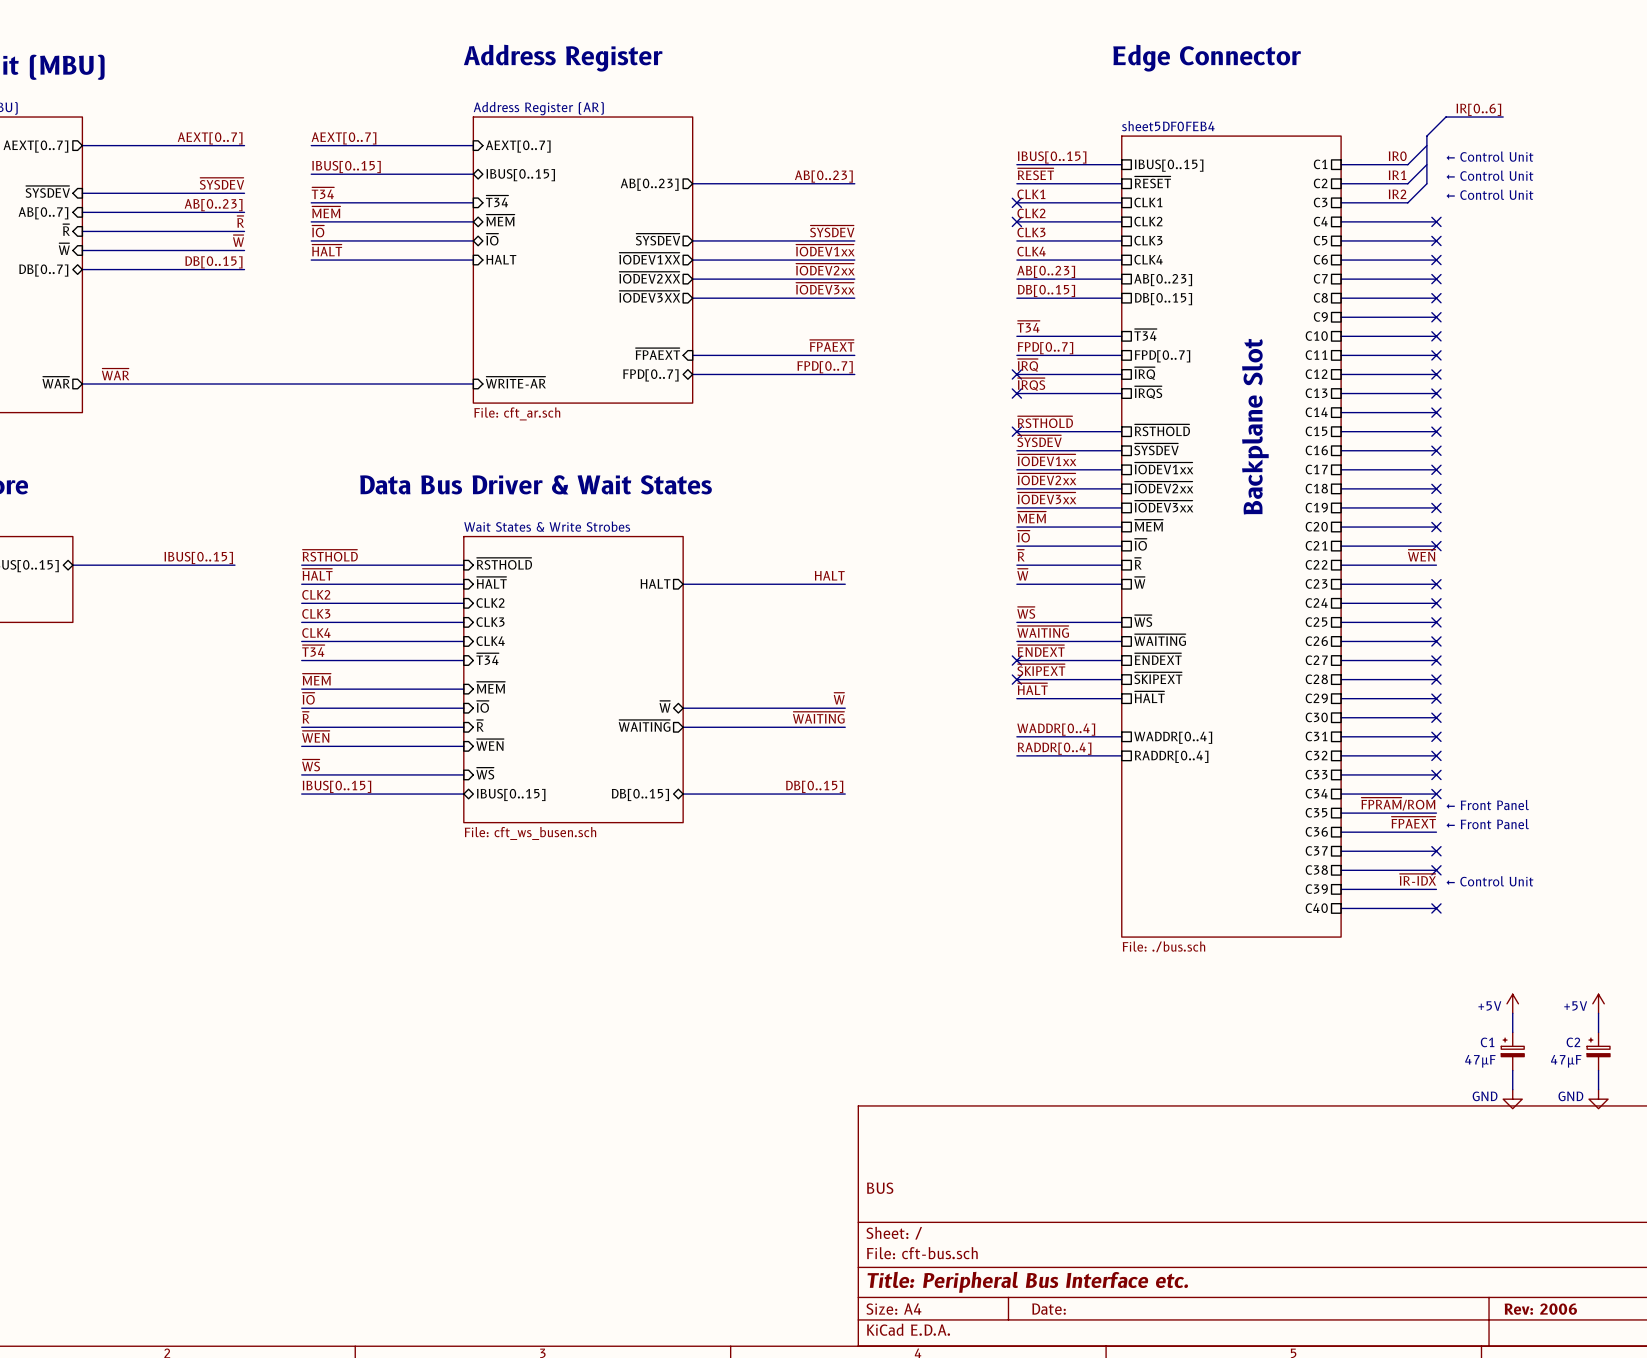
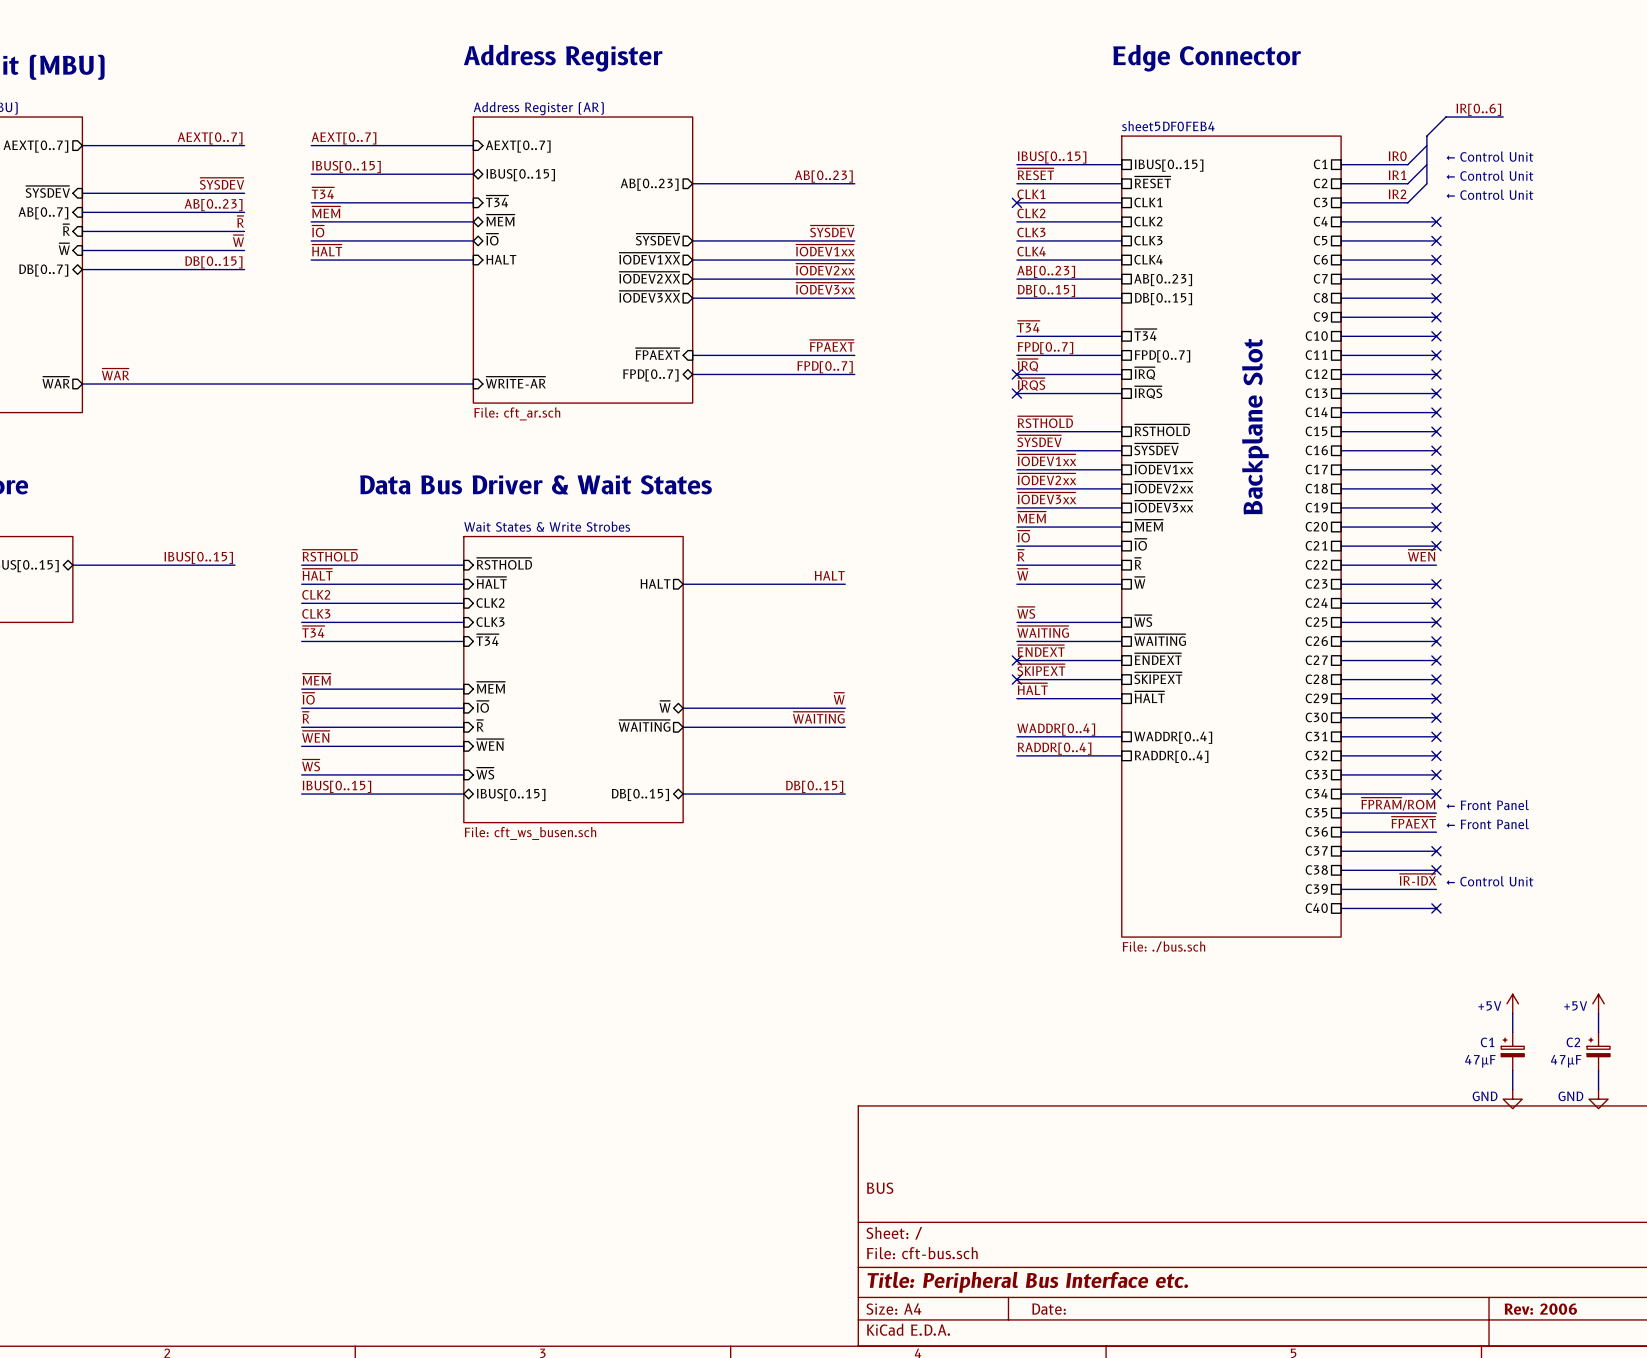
no-connect mark: (1016, 221) -> none
no-connect mark: (1016, 431) -> none
label: CLK4 (316, 633) -> ~{T34} (313, 631)
sheet pin: CLK4 (490, 641) -> ~{T34} (487, 640)
label: ~{T34} (313, 650) -> none
sheet pin: ~{T34} (487, 659) -> none
wire: (301, 660) (463, 660) -> none

